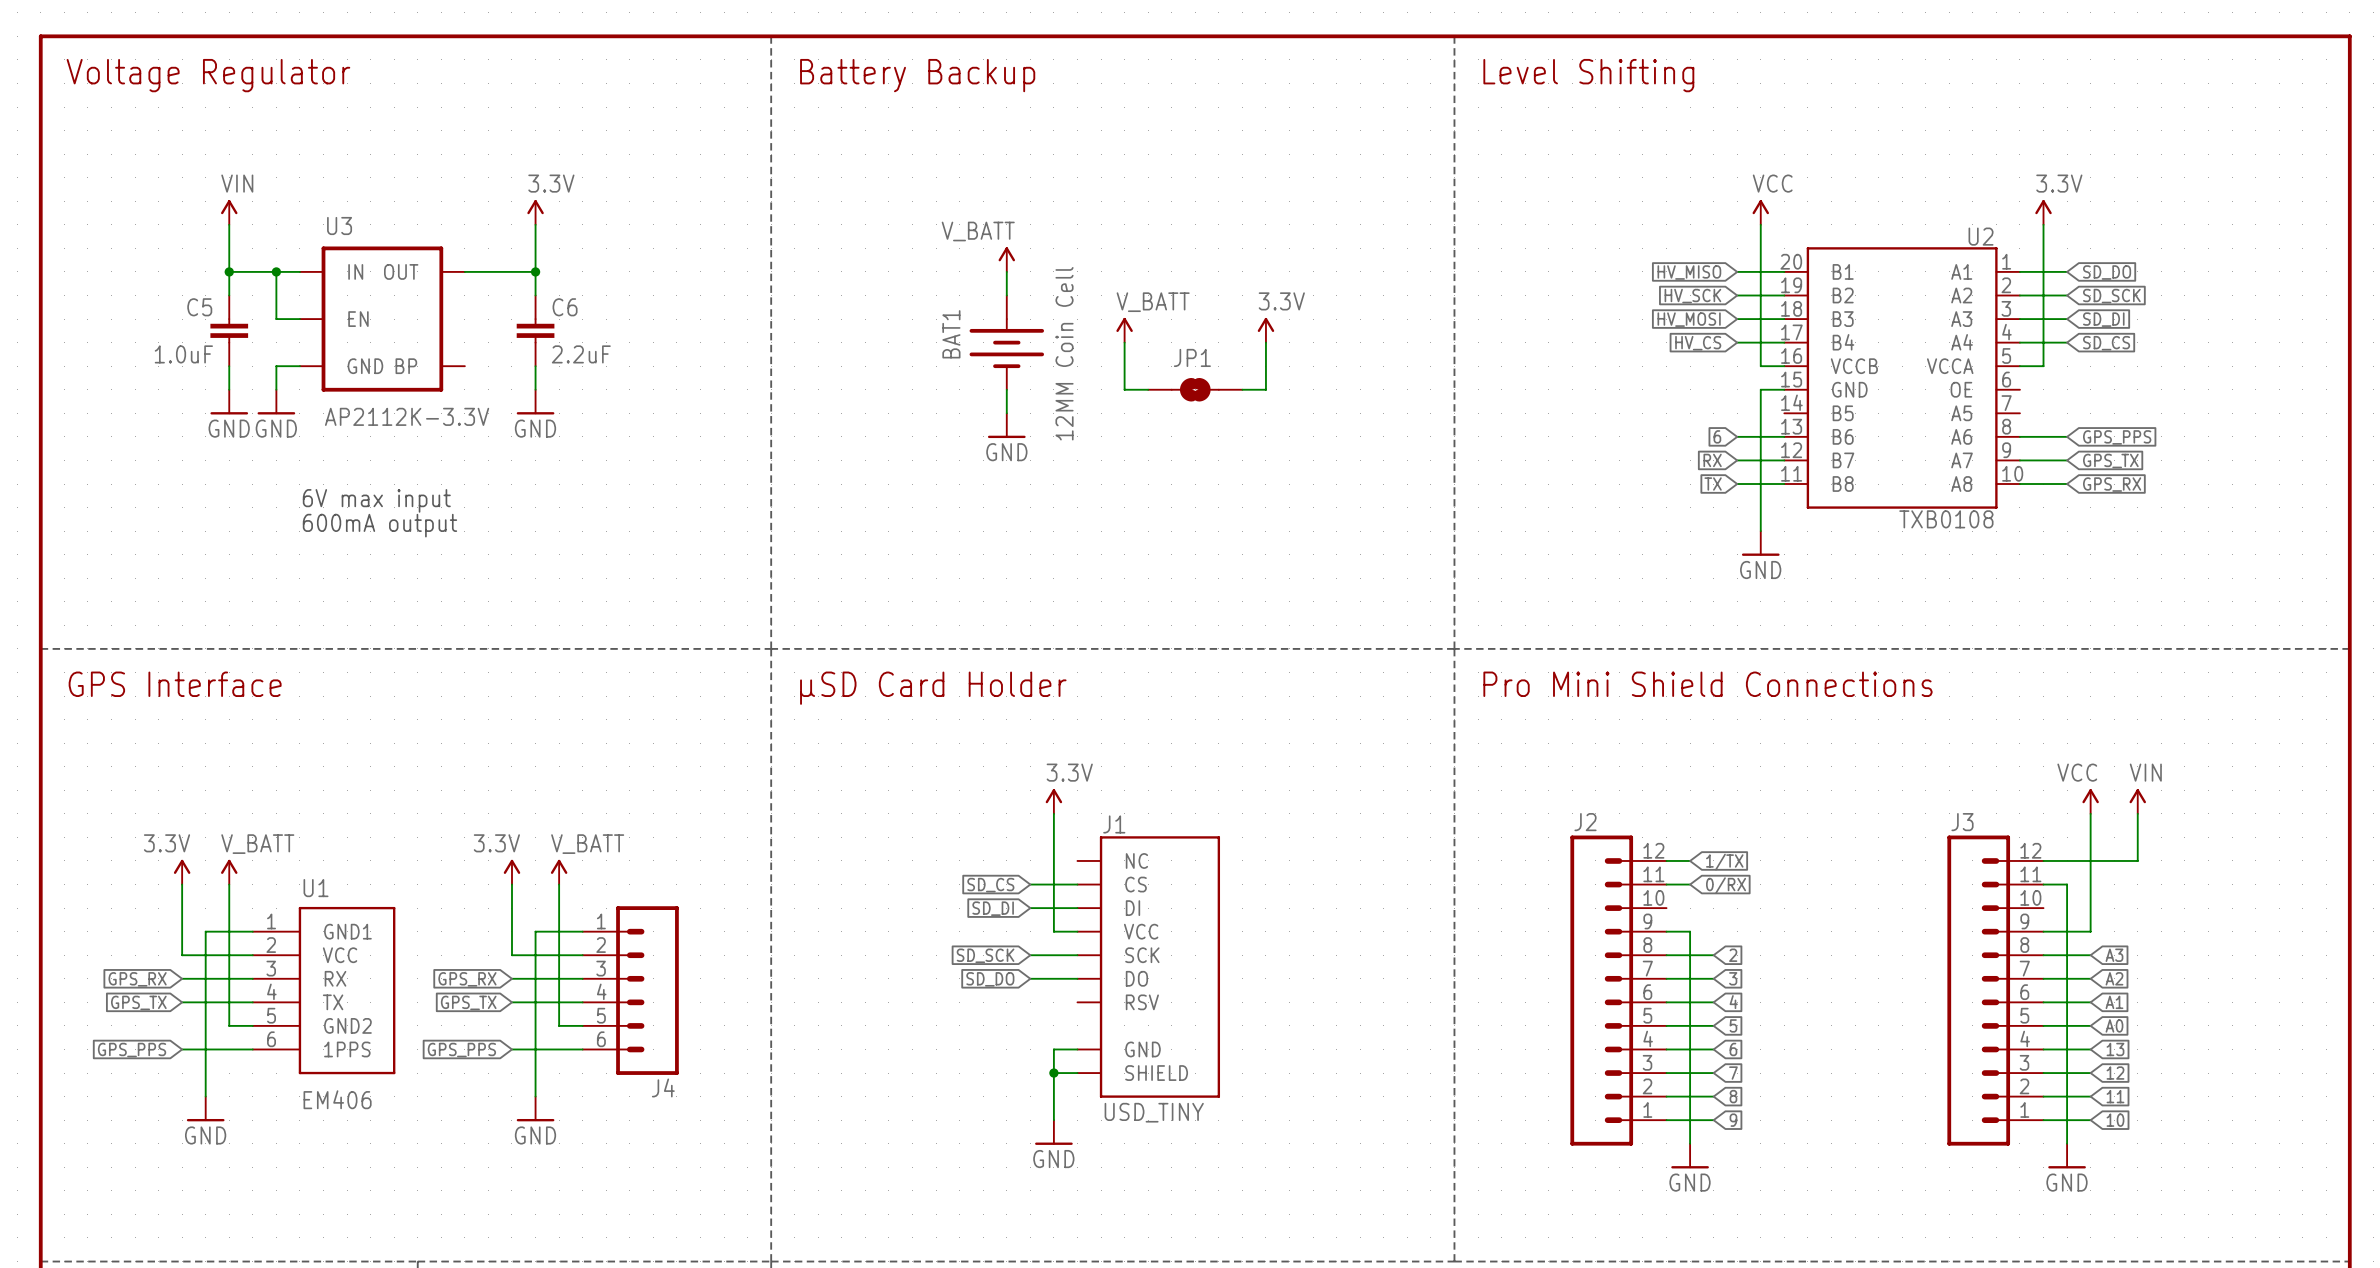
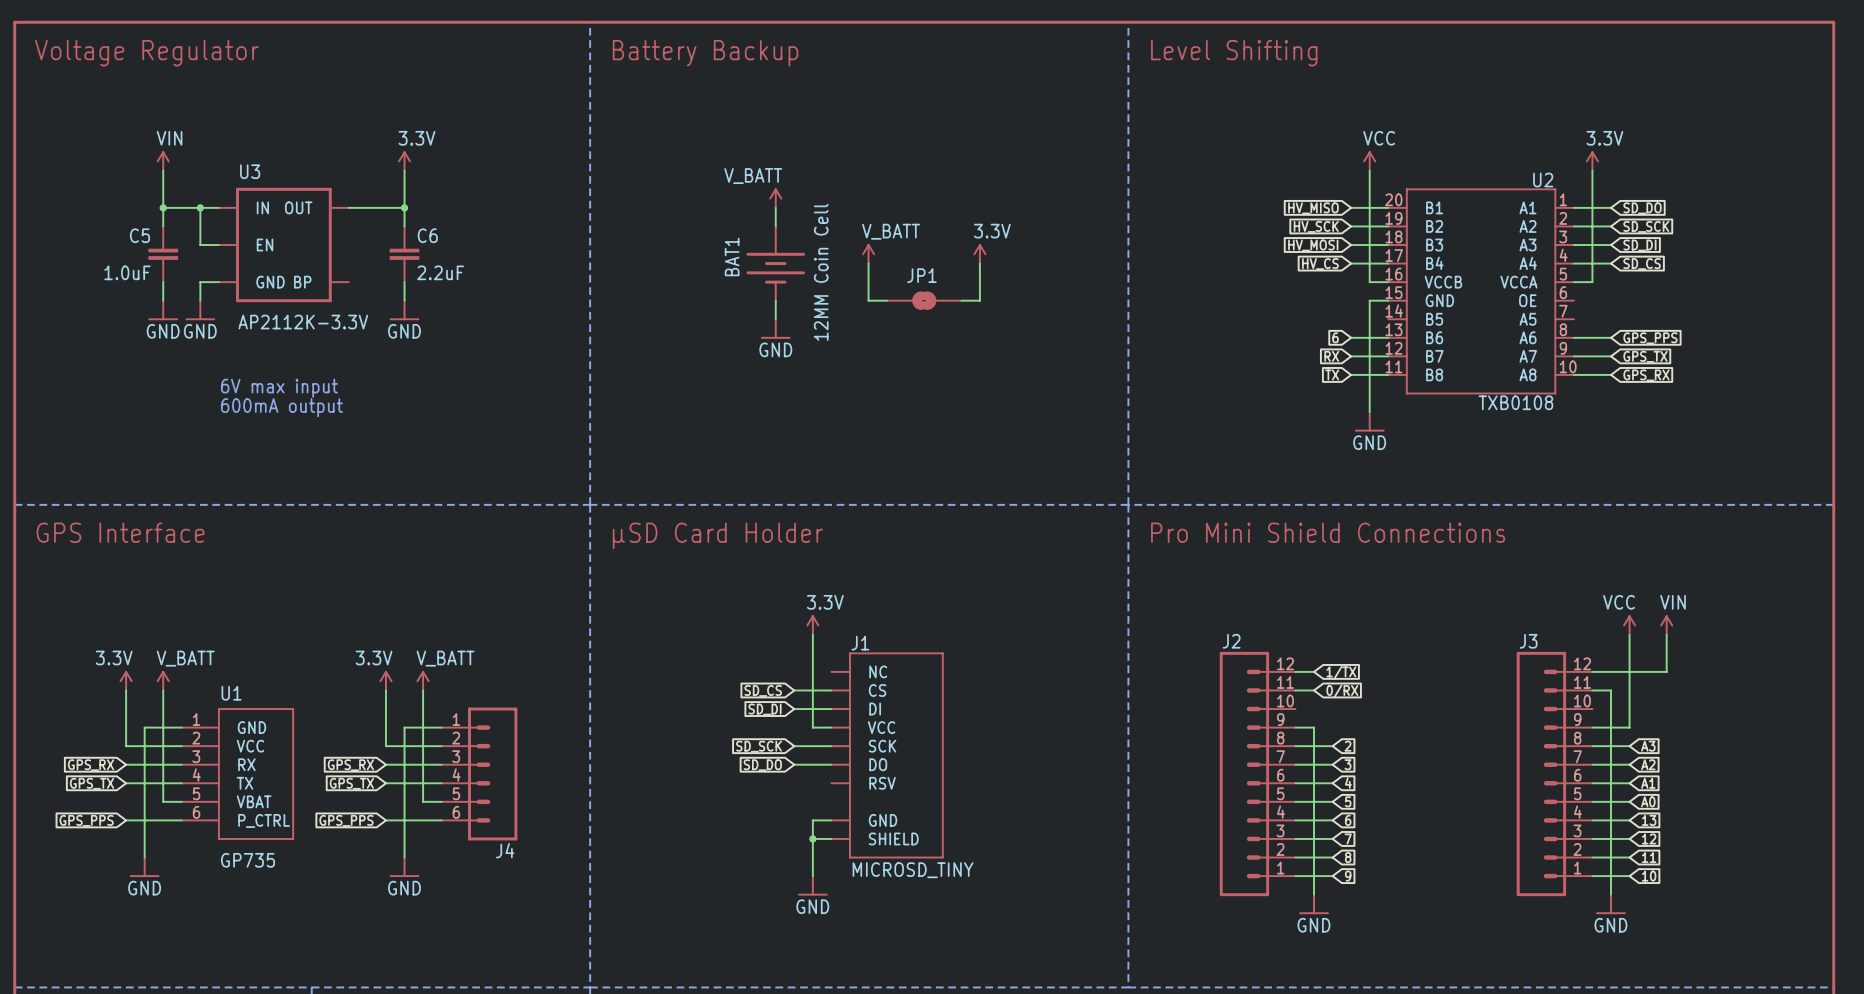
U1 pin name: GND1 (347, 931) -> GND (251, 727)
U1 pin name: GND2 (347, 1025) -> VBAT (254, 801)
U1 pin name: 1PPS (347, 1049) -> P_CTRL (264, 820)
U1 value: EM406 (337, 1099) -> GP735 (248, 860)
J1 value: USD_TINY (1154, 1112) -> MICROSD_TINY (913, 870)

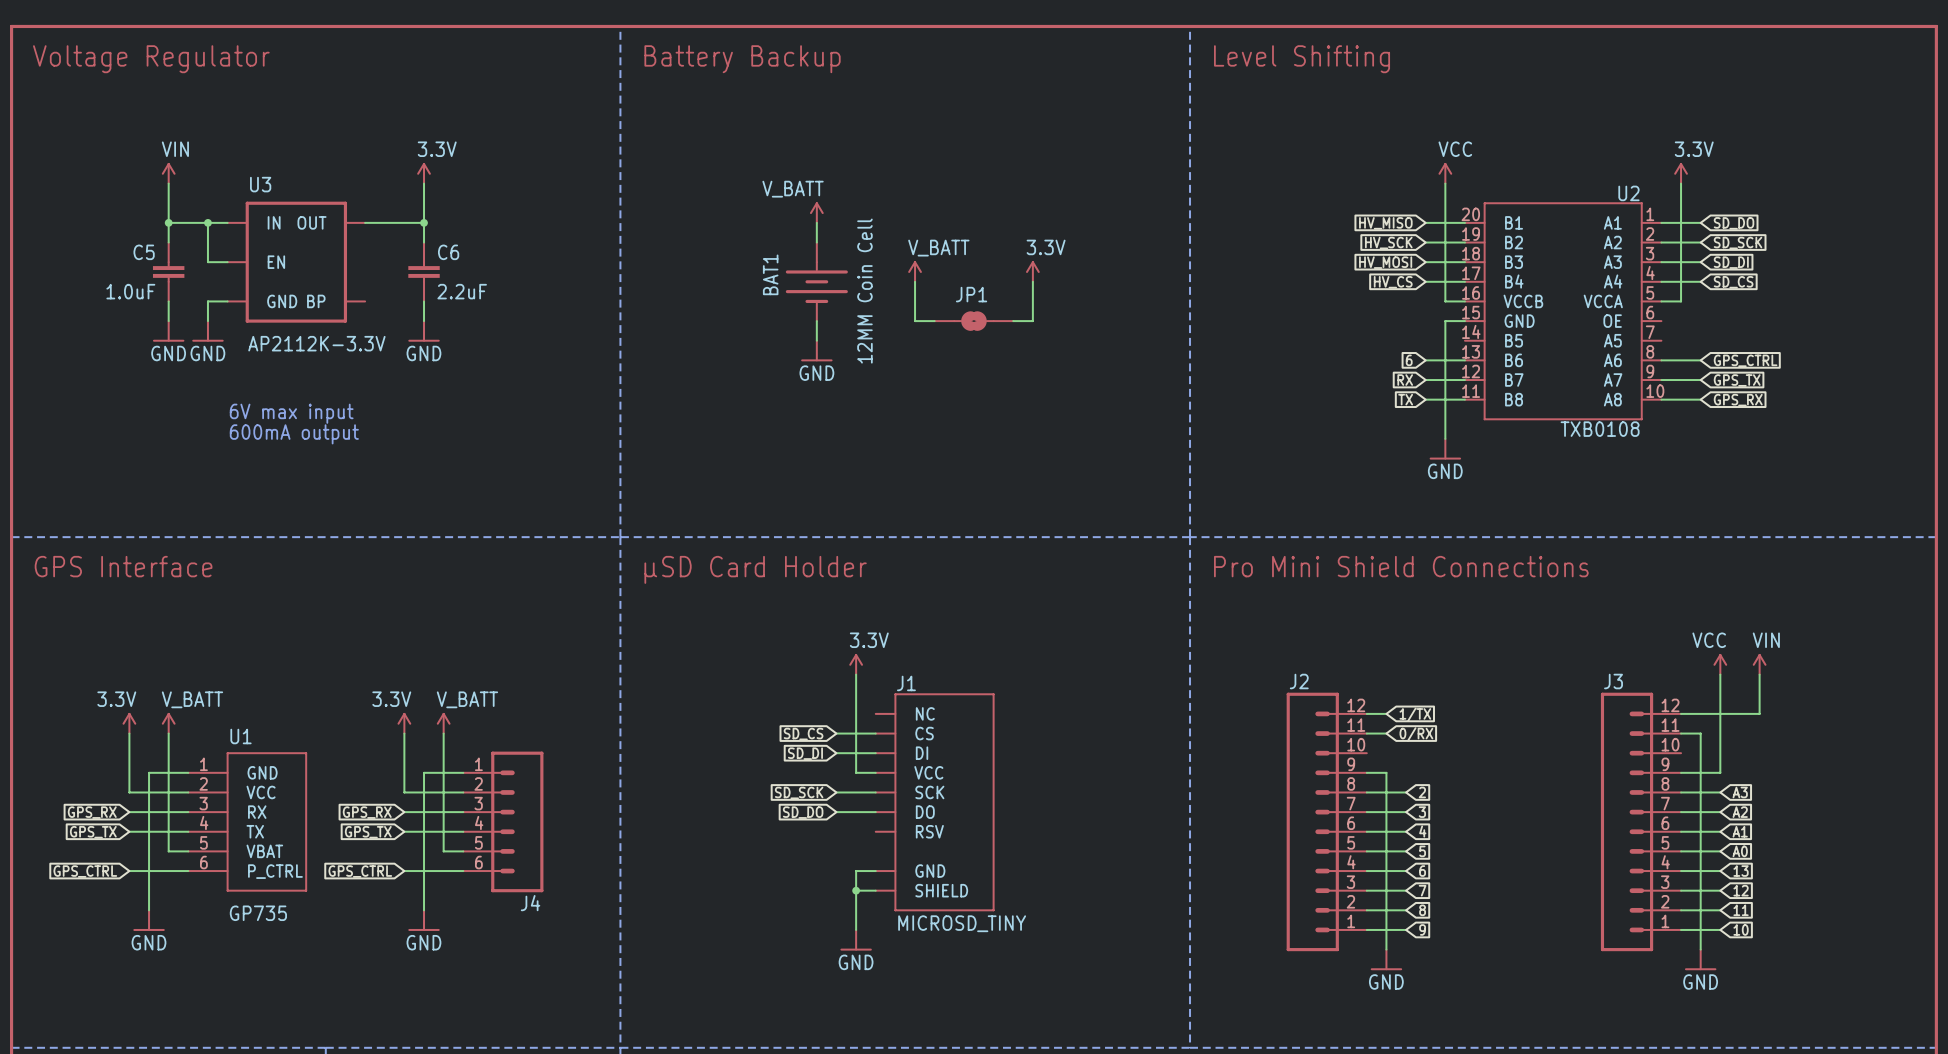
global label: GPS_PPS (1650, 338) -> GPS_CTRL (1745, 360)
global label: GPS_PPS (86, 820) -> GPS_CTRL (85, 871)
global label: GPS_PPS (346, 820) -> GPS_CTRL (360, 871)

